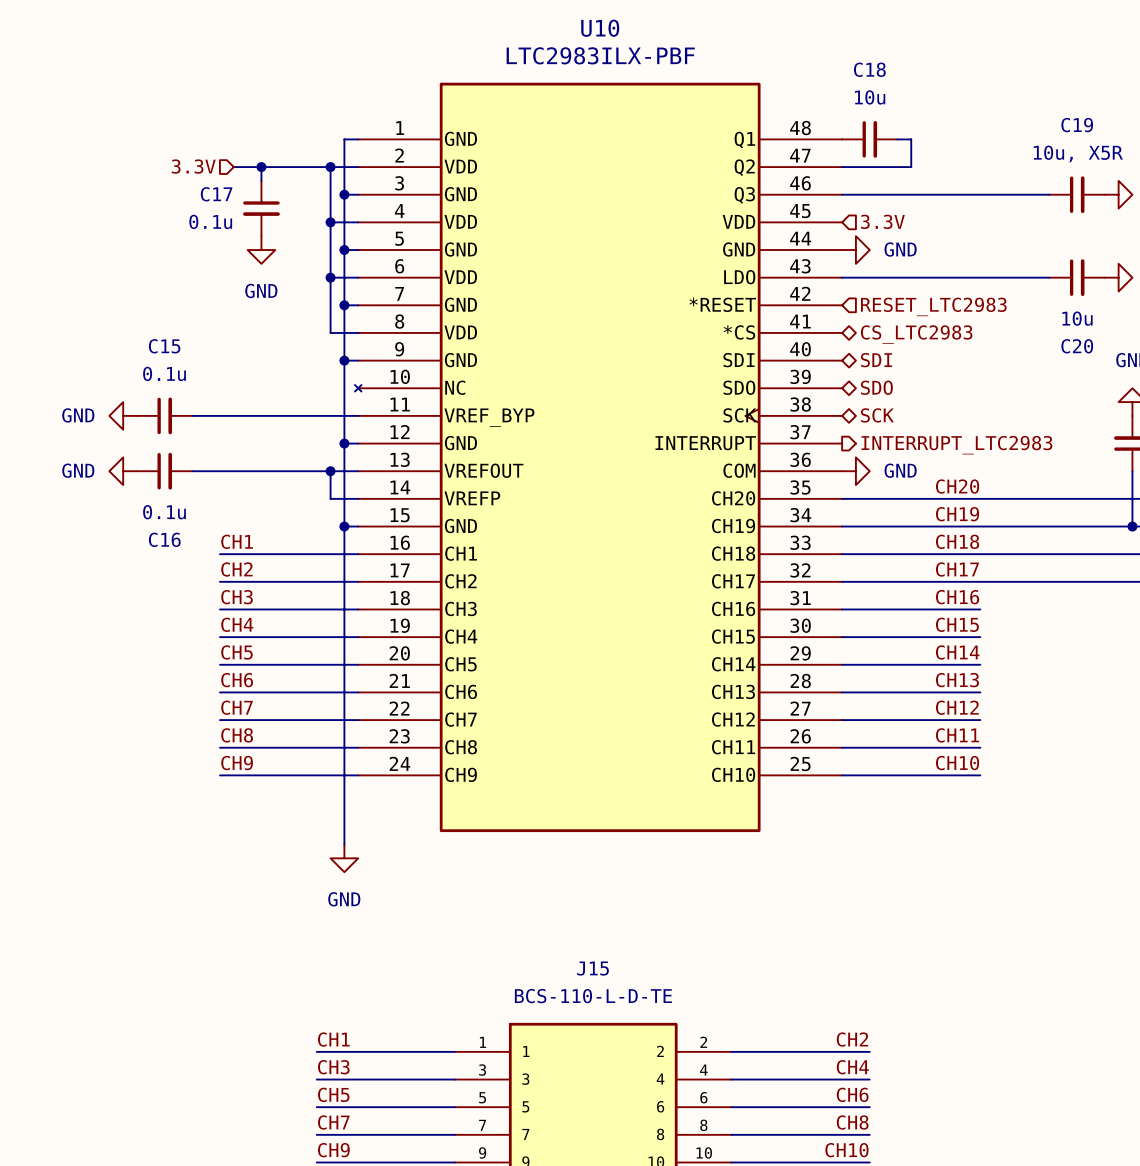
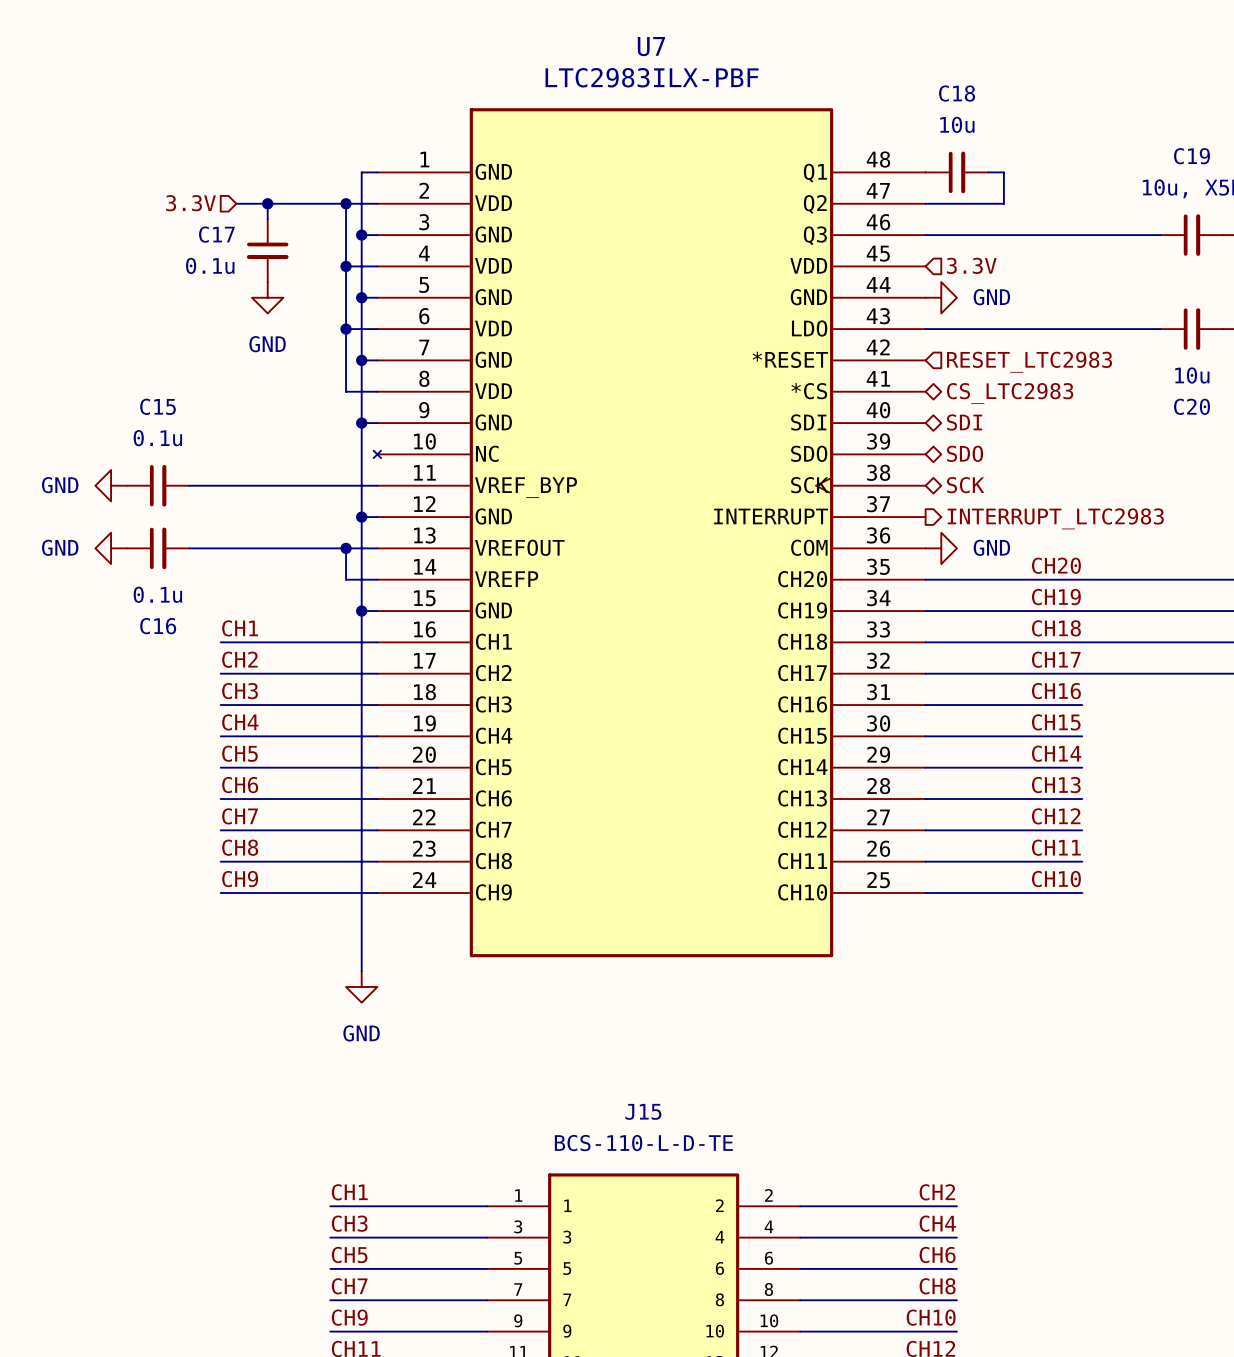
U10 name: U10 (600, 28) -> U7 (651, 46)

